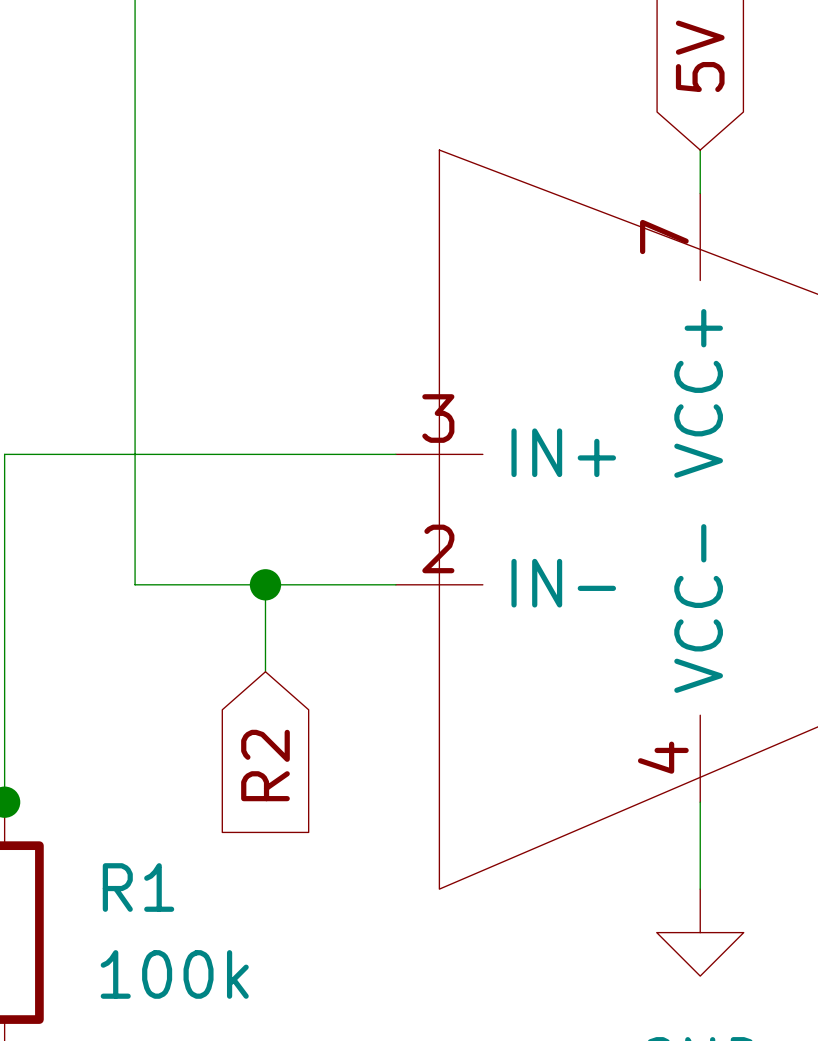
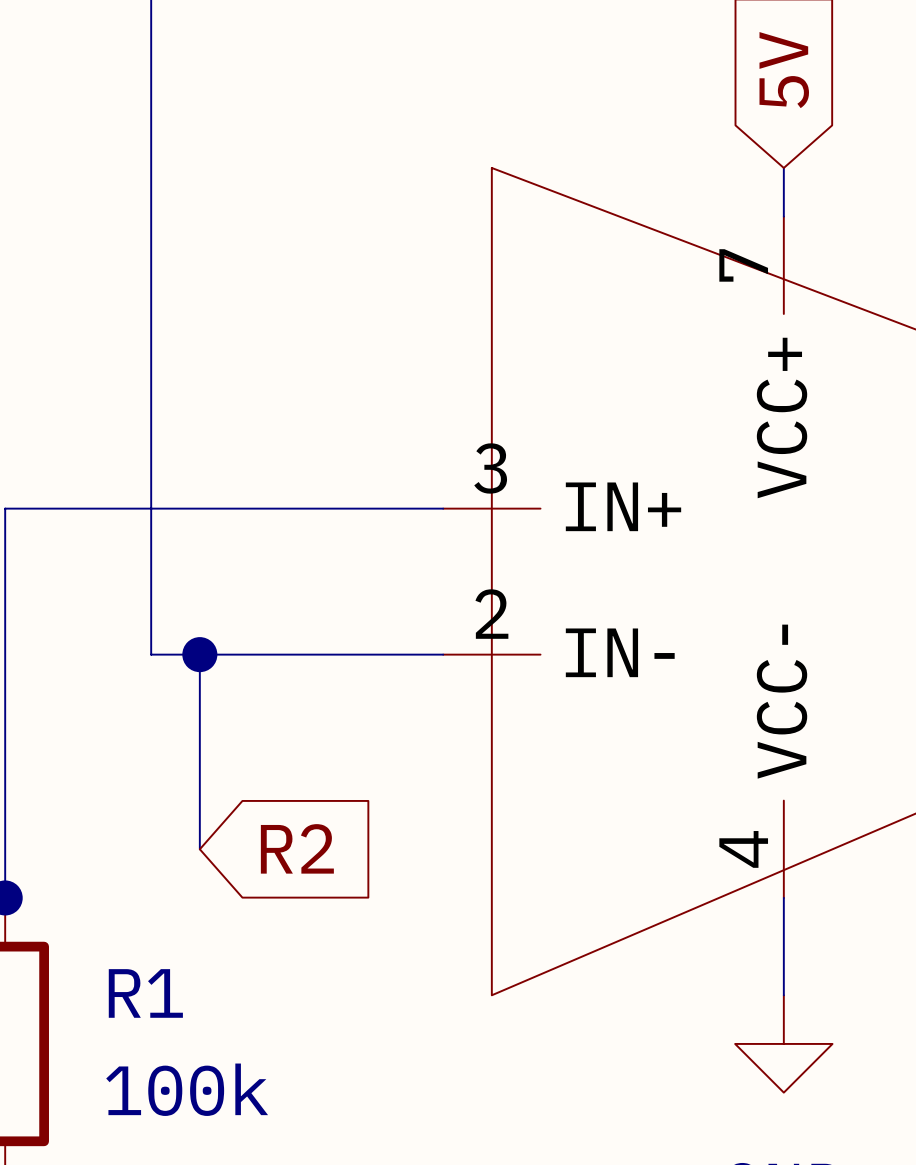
wire: none -> (199, 654) (199, 849)
wire: (265, 584) (265, 671) -> none
junction position: (265, 584) -> (199, 654)
global label rotation: 0° (265, 765) -> 90° counterclockwise (297, 848)

